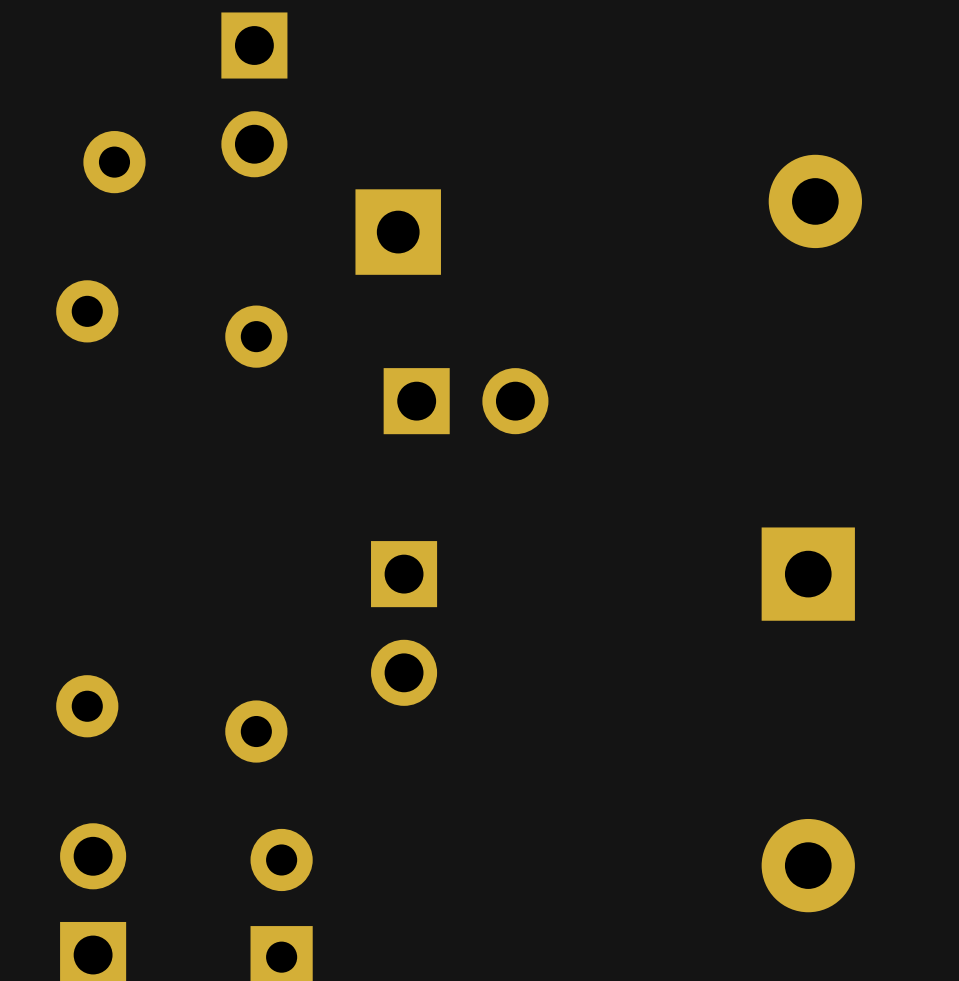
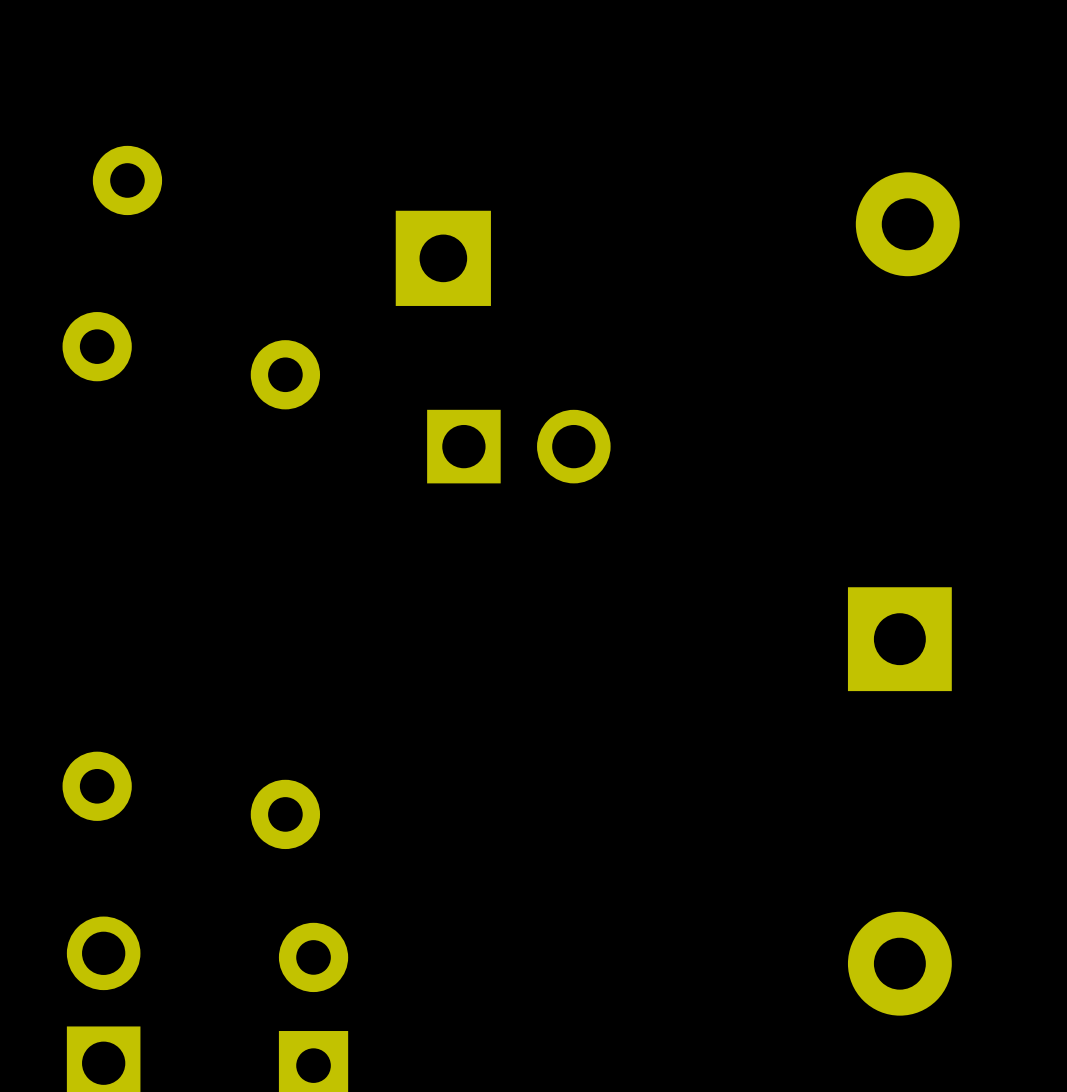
part: (254, 94) -> none
part: (404, 623) -> none

